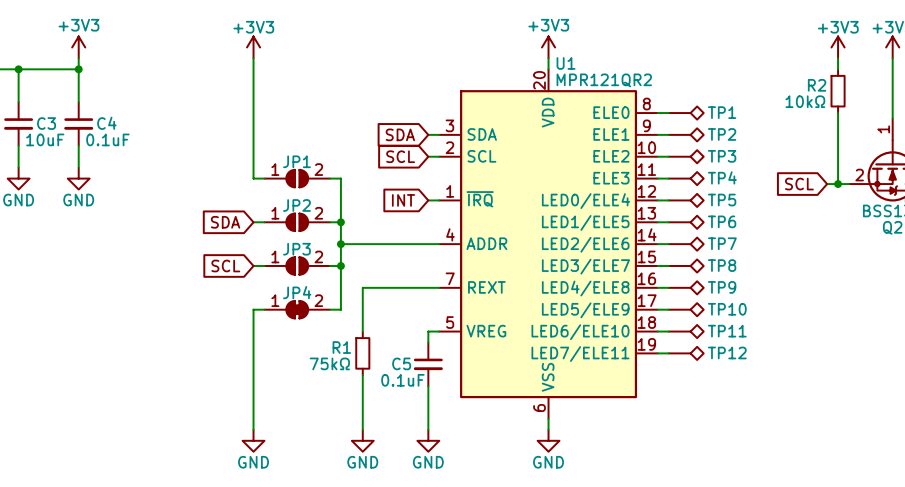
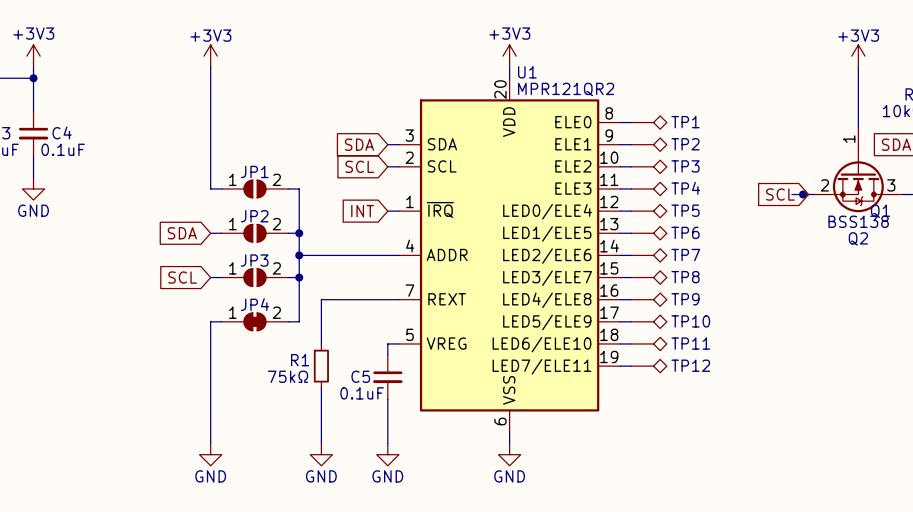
power symbol: +3V3 (838, 47) -> none
wire: (838, 58) (838, 69) -> none
R2: 10kΩ (838, 91) -> none
wire: (838, 113) (838, 184) -> none
global label position: SCL (799, 184) -> SCL (780, 194)

